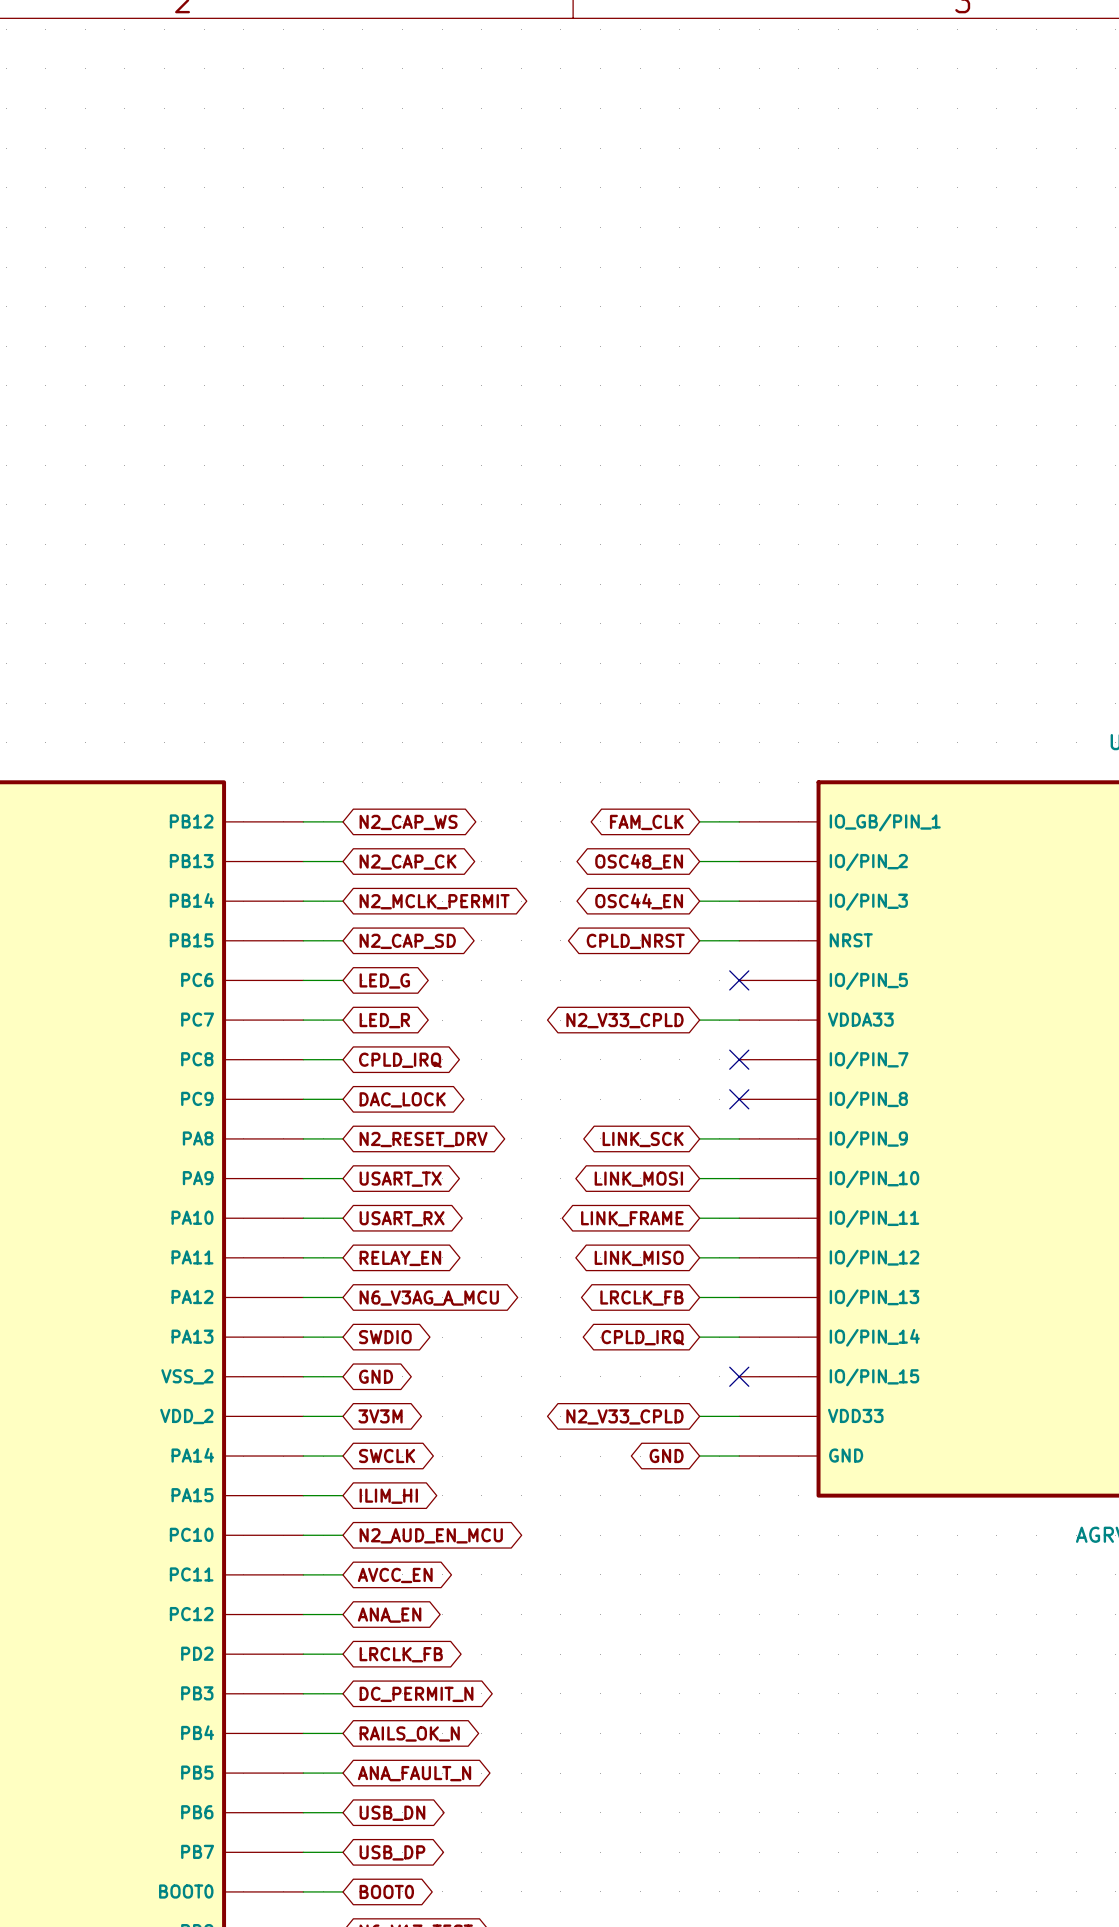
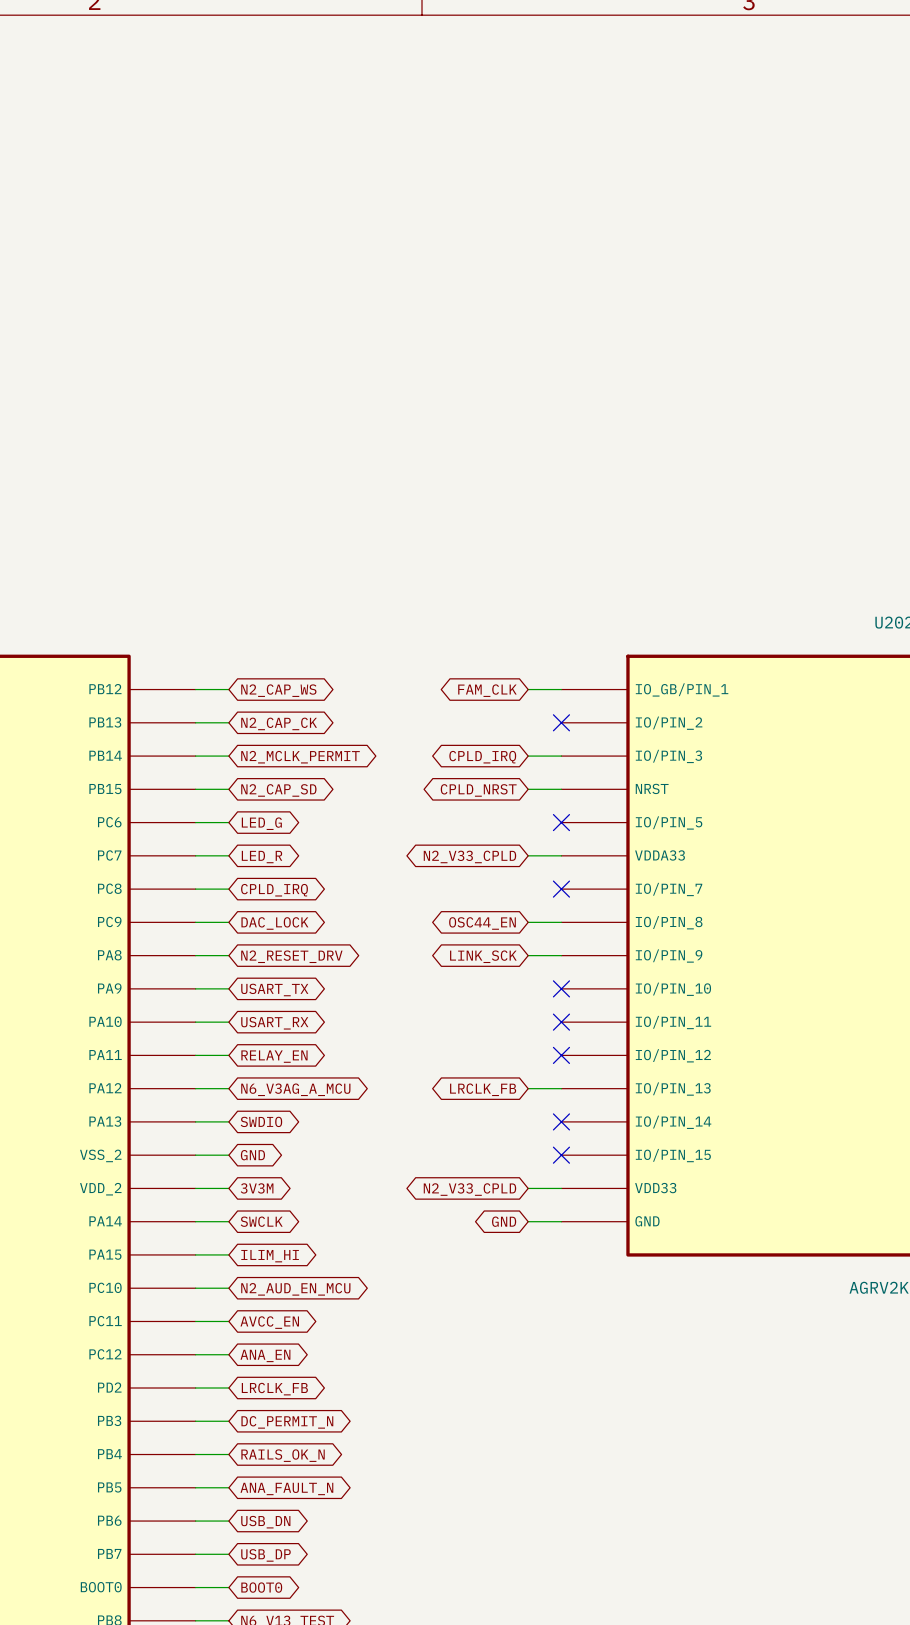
global label: OSC48_EN (639, 861) -> none
wire: (699, 861) (739, 861) -> none
no-connect mark: none -> (561, 722)
global label: OSC44_EN (639, 901) -> CPLD_IRQ (482, 757)
global label: none -> OSC44_EN (482, 923)
no-connect mark: (739, 1099) -> none
wire: (699, 1178) (739, 1178) -> (528, 922) (561, 922)
no-connect mark: none -> (561, 988)
global label: LINK_MOSI (638, 1179) -> none
global label: LINK_FRAME (632, 1218) -> none
wire: (699, 1218) (739, 1218) -> none
no-connect mark: none -> (561, 1022)
wire: (699, 1257) (739, 1257) -> none
no-connect mark: none -> (561, 1055)
global label: LINK_MISO (639, 1258) -> none
global label: CPLD_IRQ (642, 1337) -> none
wire: (699, 1337) (739, 1337) -> none
no-connect mark: none -> (561, 1121)

